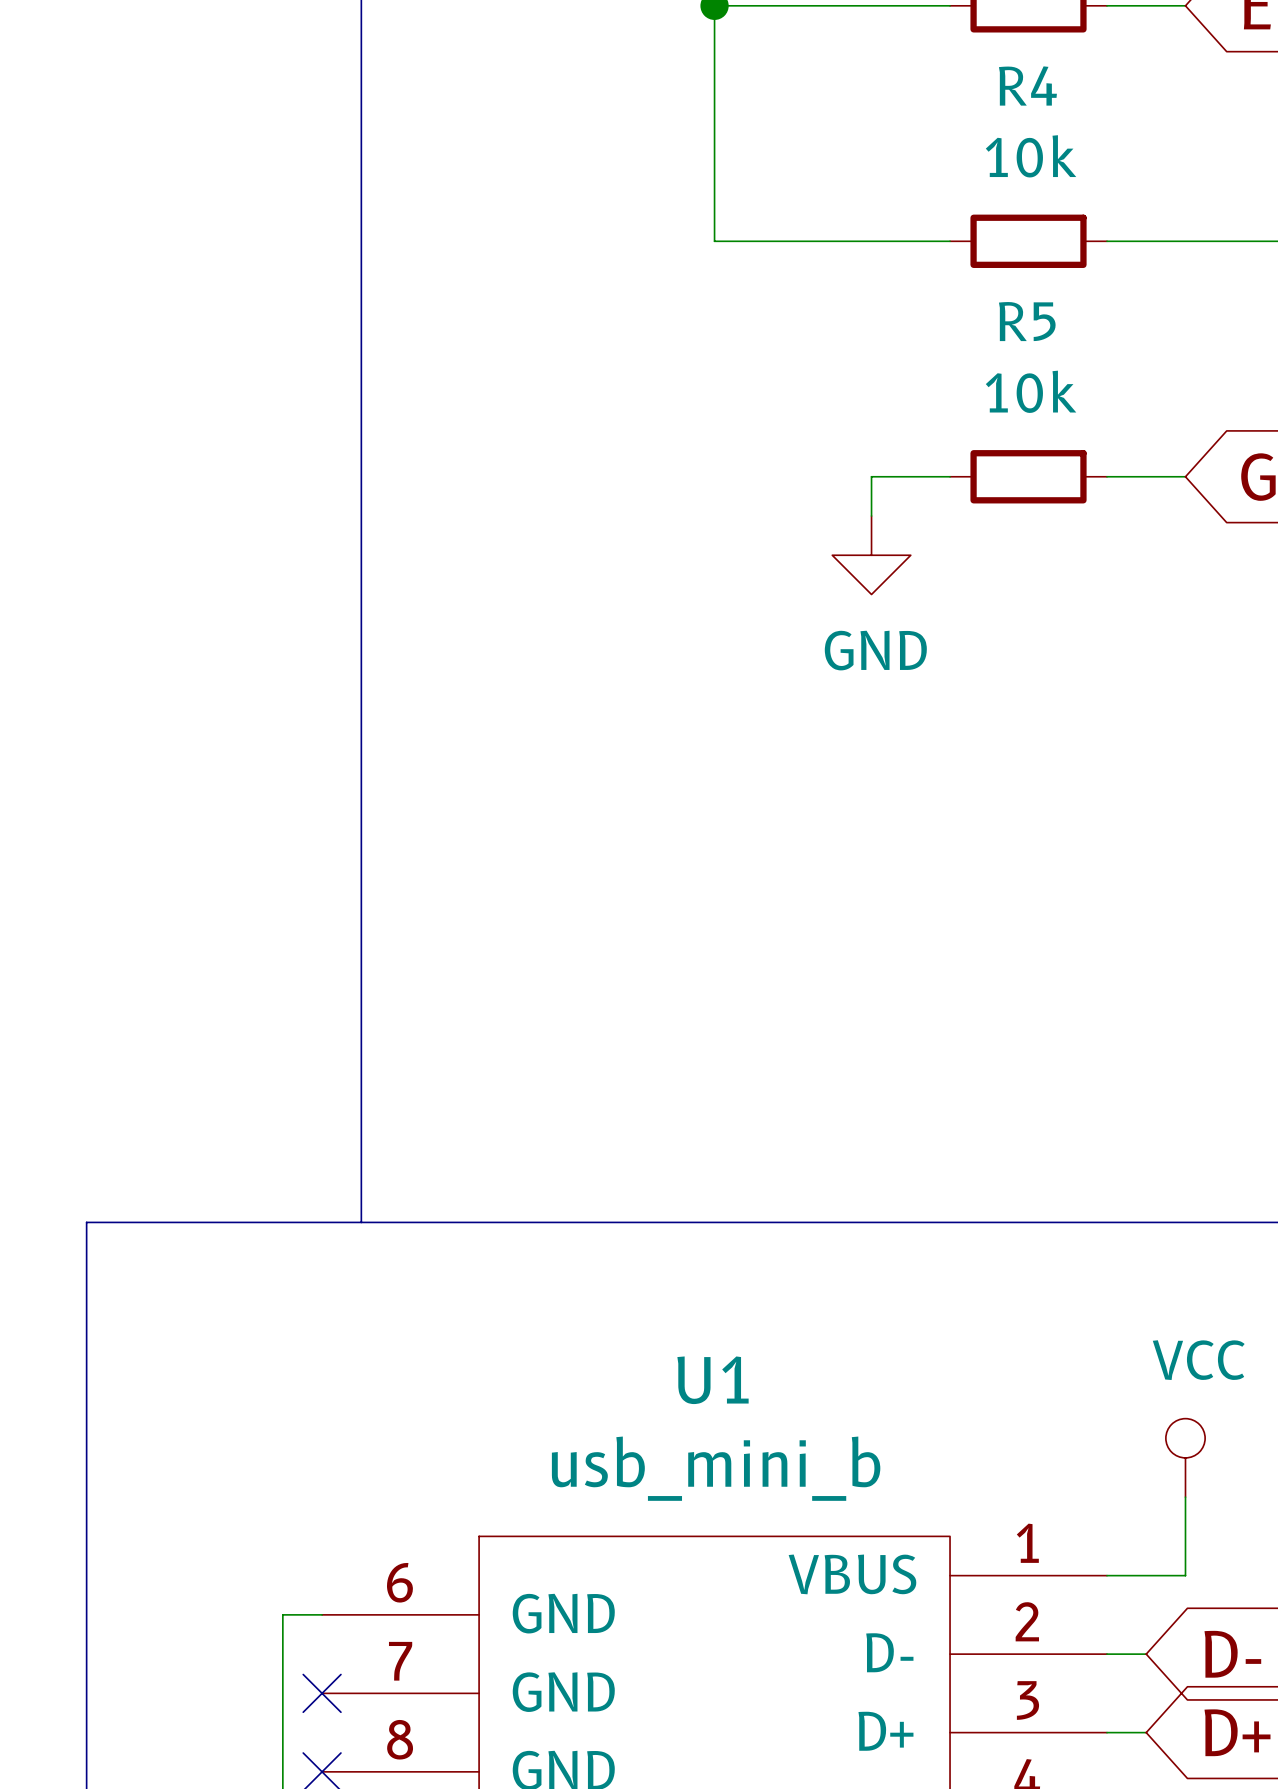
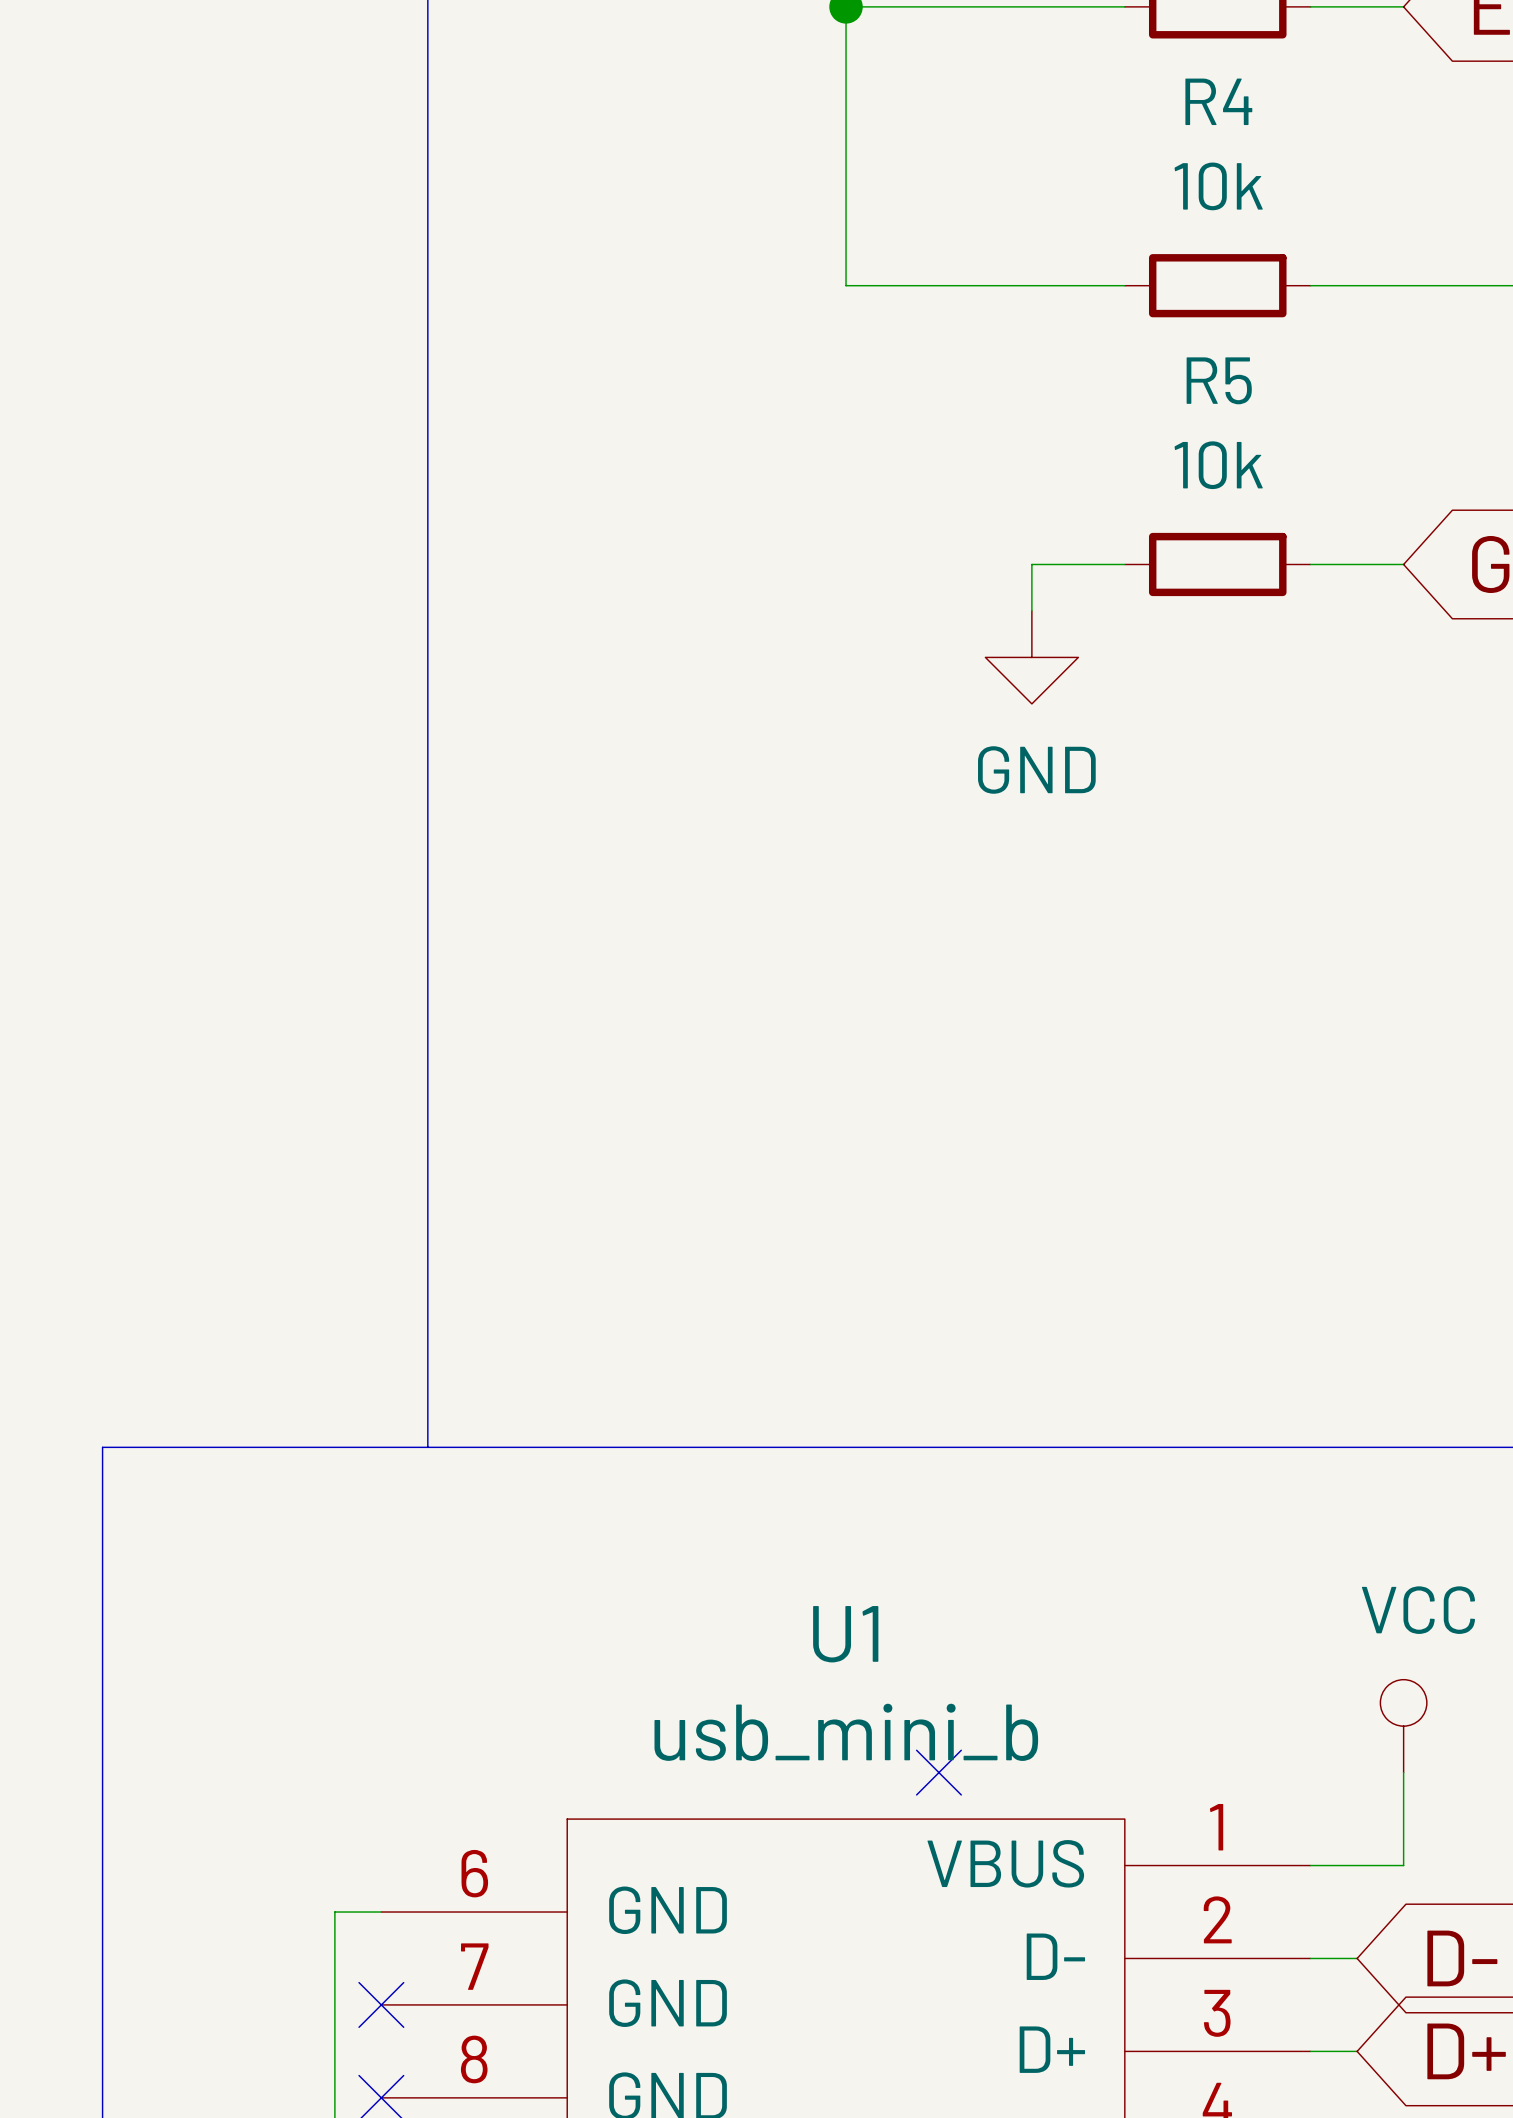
no-connect mark: none -> (938, 1772)

